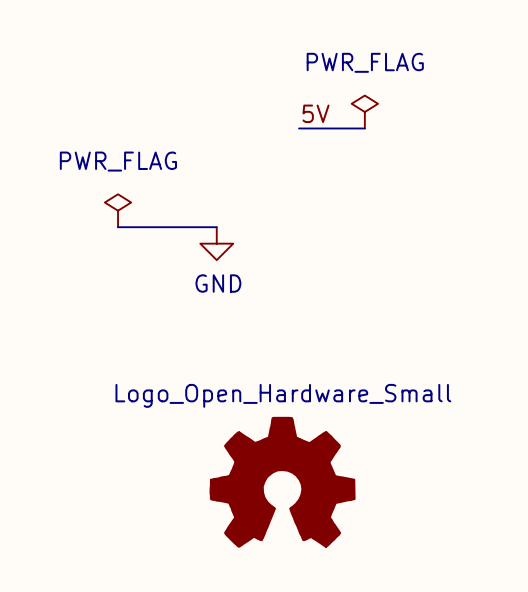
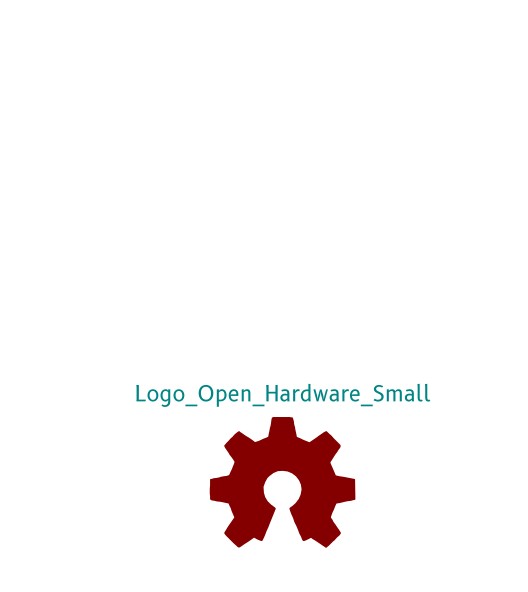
power symbol: PWR_FLAG (364, 112) -> none
label: 5V (316, 113) -> none
wire: (299, 128) (364, 128) -> none
power symbol: PWR_FLAG (118, 210) -> none
wire: (118, 227) (216, 227) -> none
power symbol: GND (216, 243) -> none

